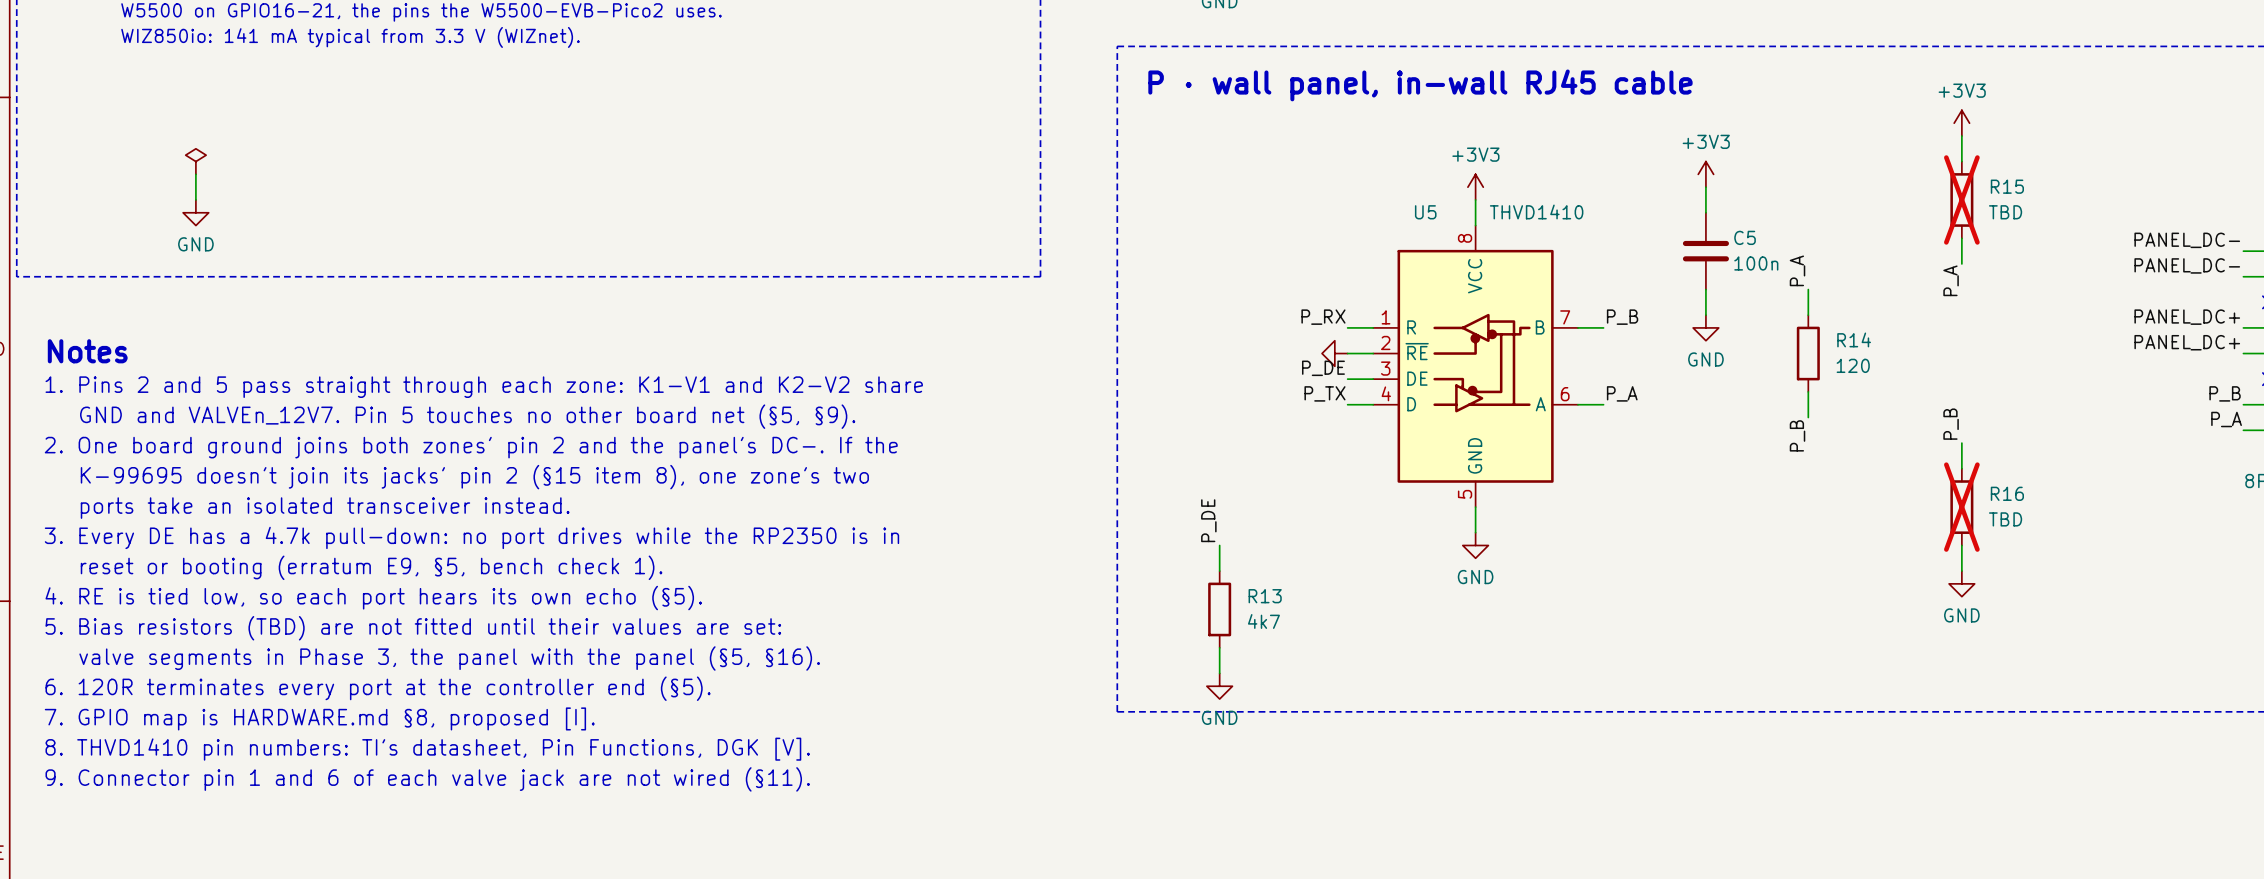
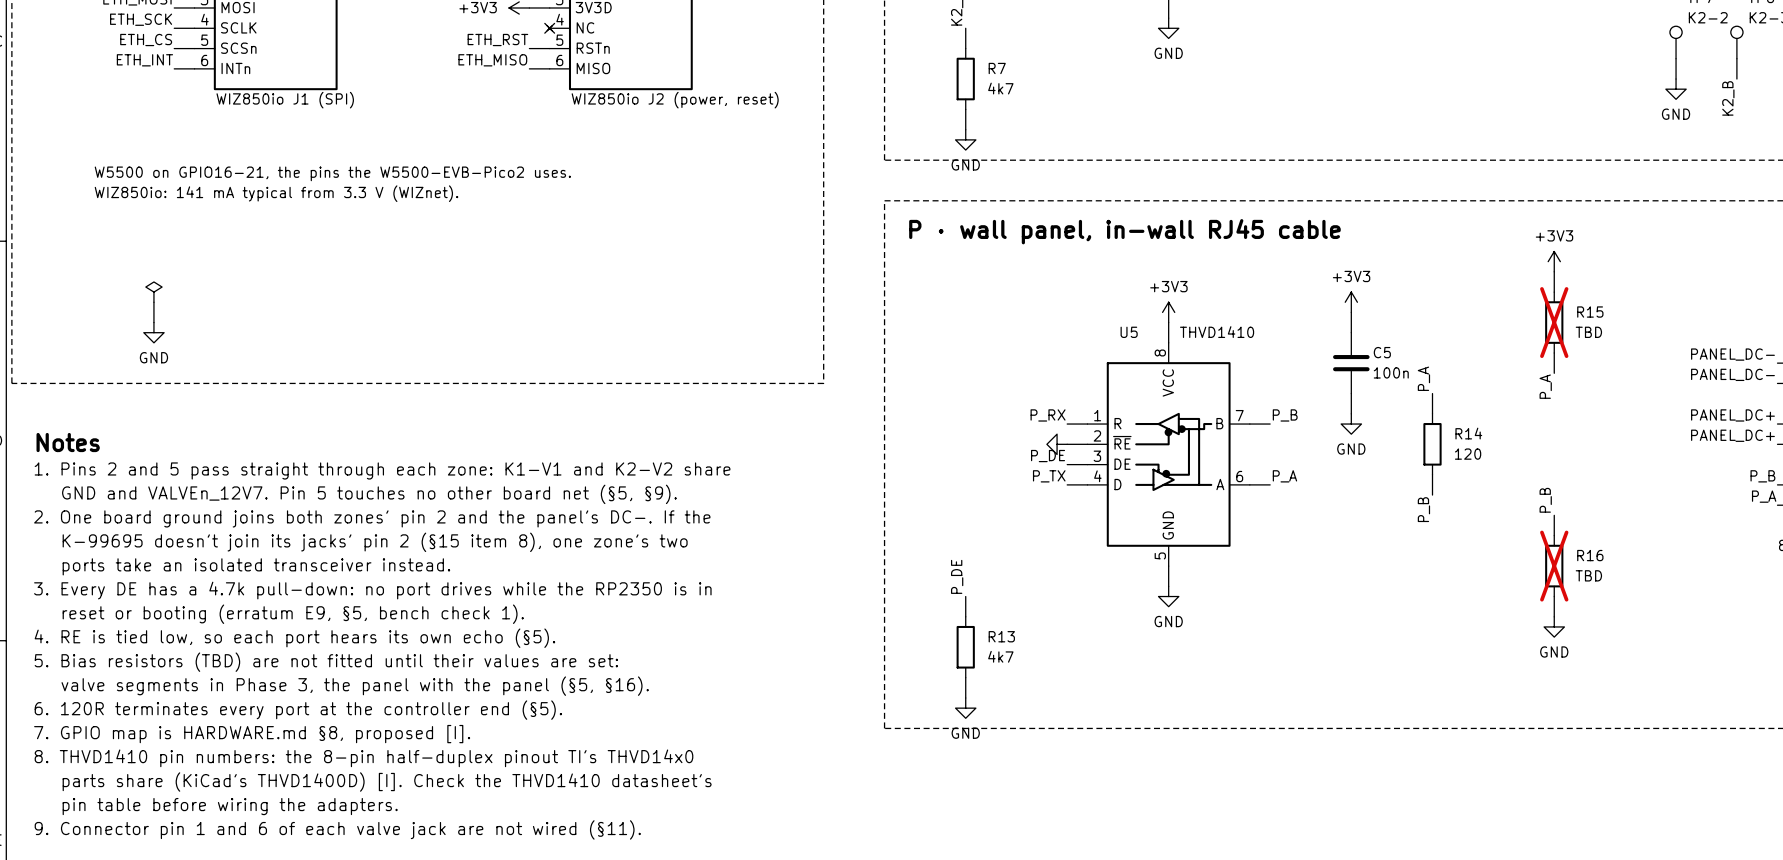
text: 8. THVD1410 pin numbers: TI's datasheet, Pin Functions, DGK [V]. (427, 749) -> 8. THVD1410 pin numbers: the 8-pin half-duplex pinout TI's THVD14x0 (364, 758)
text: 9. Connector pin 1 and 6 of each valve jack are not wired (§11). (427, 779) -> parts share (KiCad's THVD1400D) [I]. Check the THVD1410 datasheet's (387, 782)
text: none -> pin table before wiring the adapters. (230, 806)
text: none -> 9. Connector pin 1 and 6 of each valve jack are not wired (§11). (337, 829)

